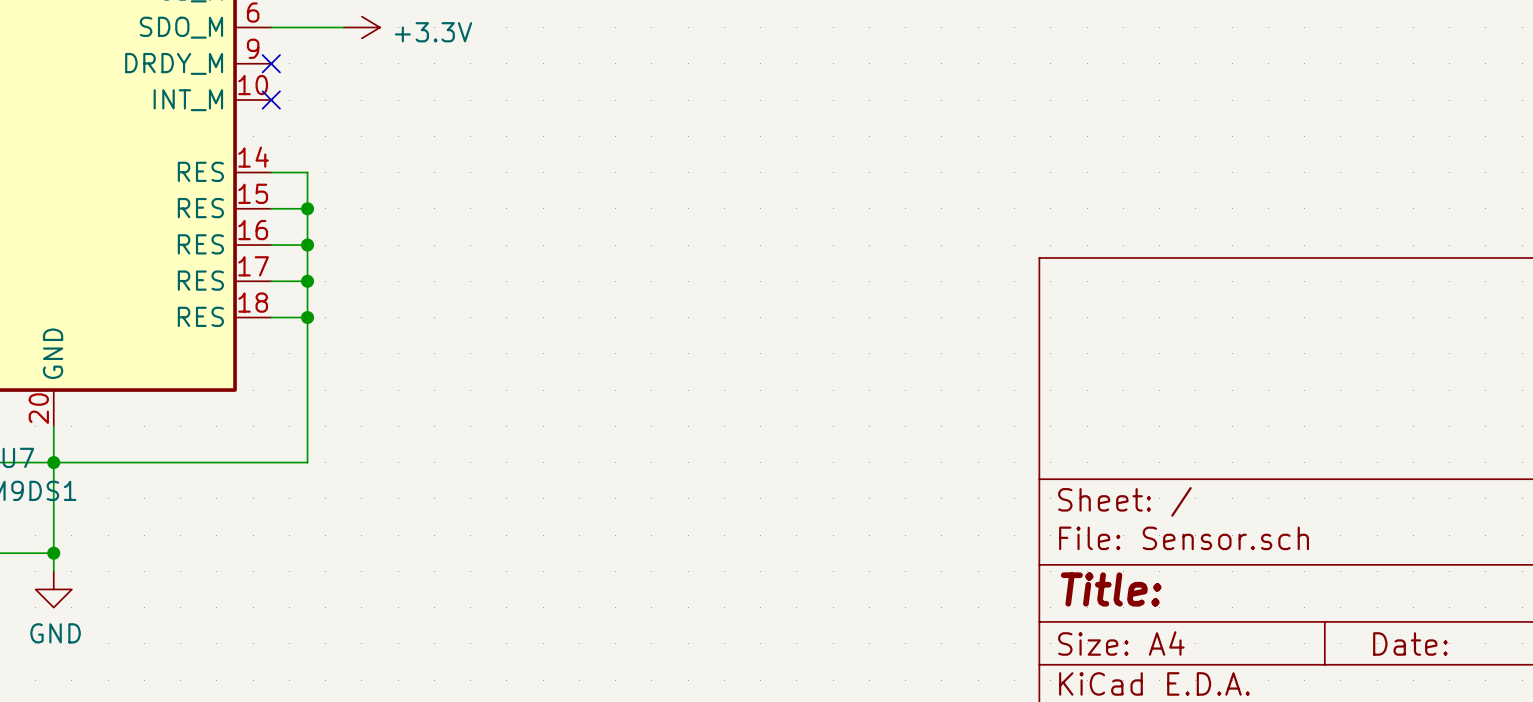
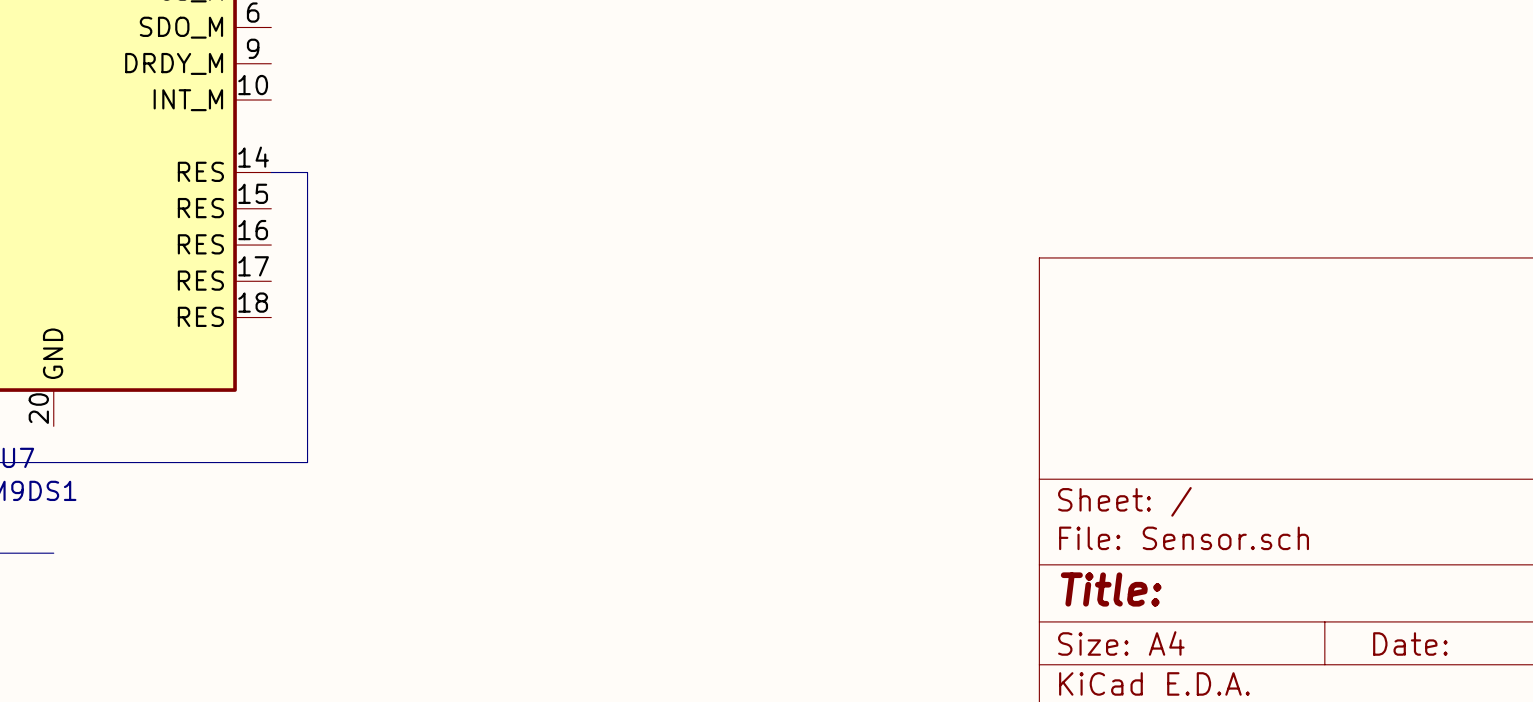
wire: (271, 27) (343, 27) -> none
power symbol: +3.3V (361, 27) -> none
no-connect mark: (271, 63) -> none
no-connect mark: (271, 100) -> none
wire: (271, 208) (307, 208) -> none
junction: (307, 208) -> none
wire: (271, 245) (307, 245) -> none
junction: (307, 245) -> none
wire: (271, 281) (307, 281) -> none
junction: (307, 281) -> none
wire: (271, 317) (307, 317) -> none
junction: (307, 317) -> none
wire: (53, 426) (53, 571) -> none
junction: (53, 462) -> none
junction: (53, 553) -> none
power symbol: GND (53, 589) -> none

